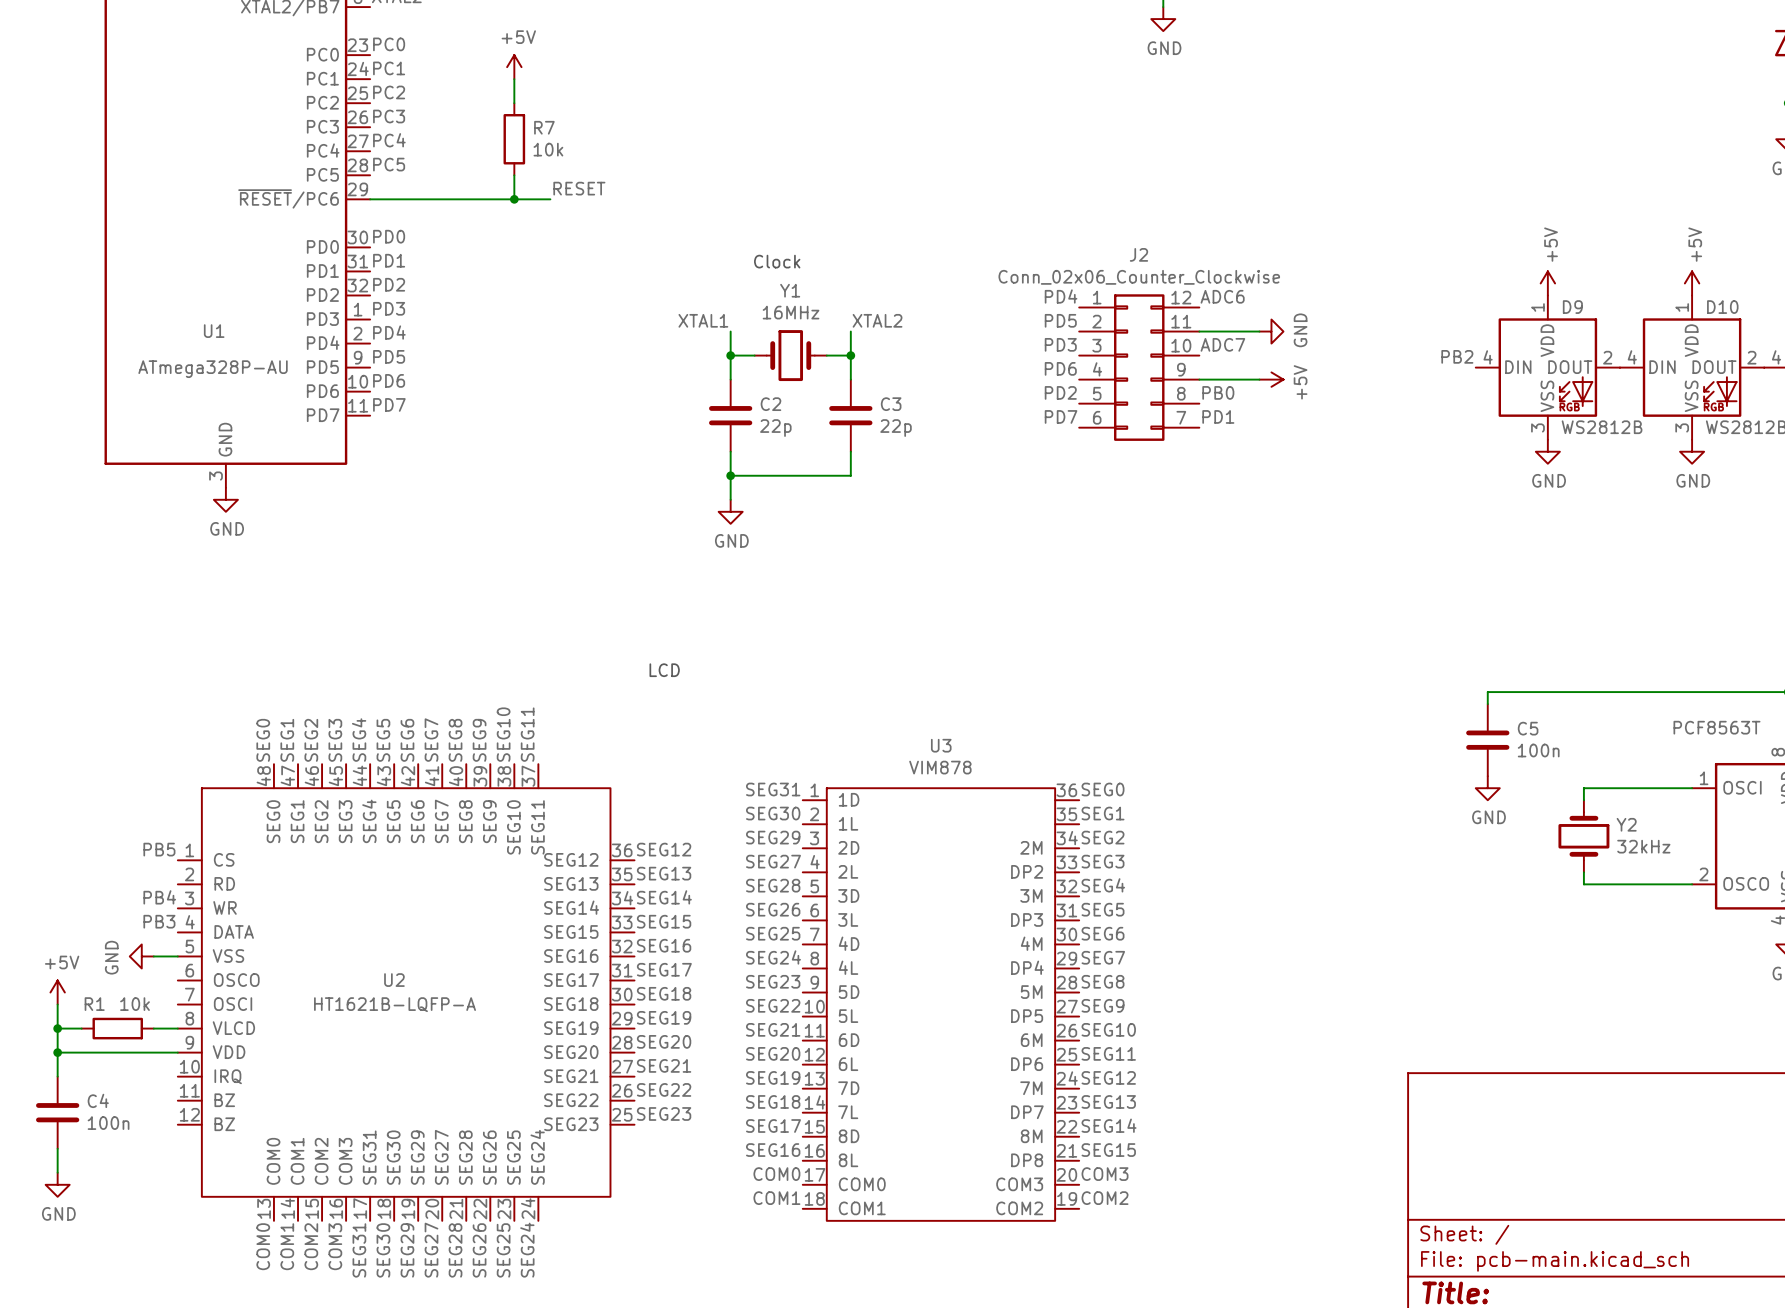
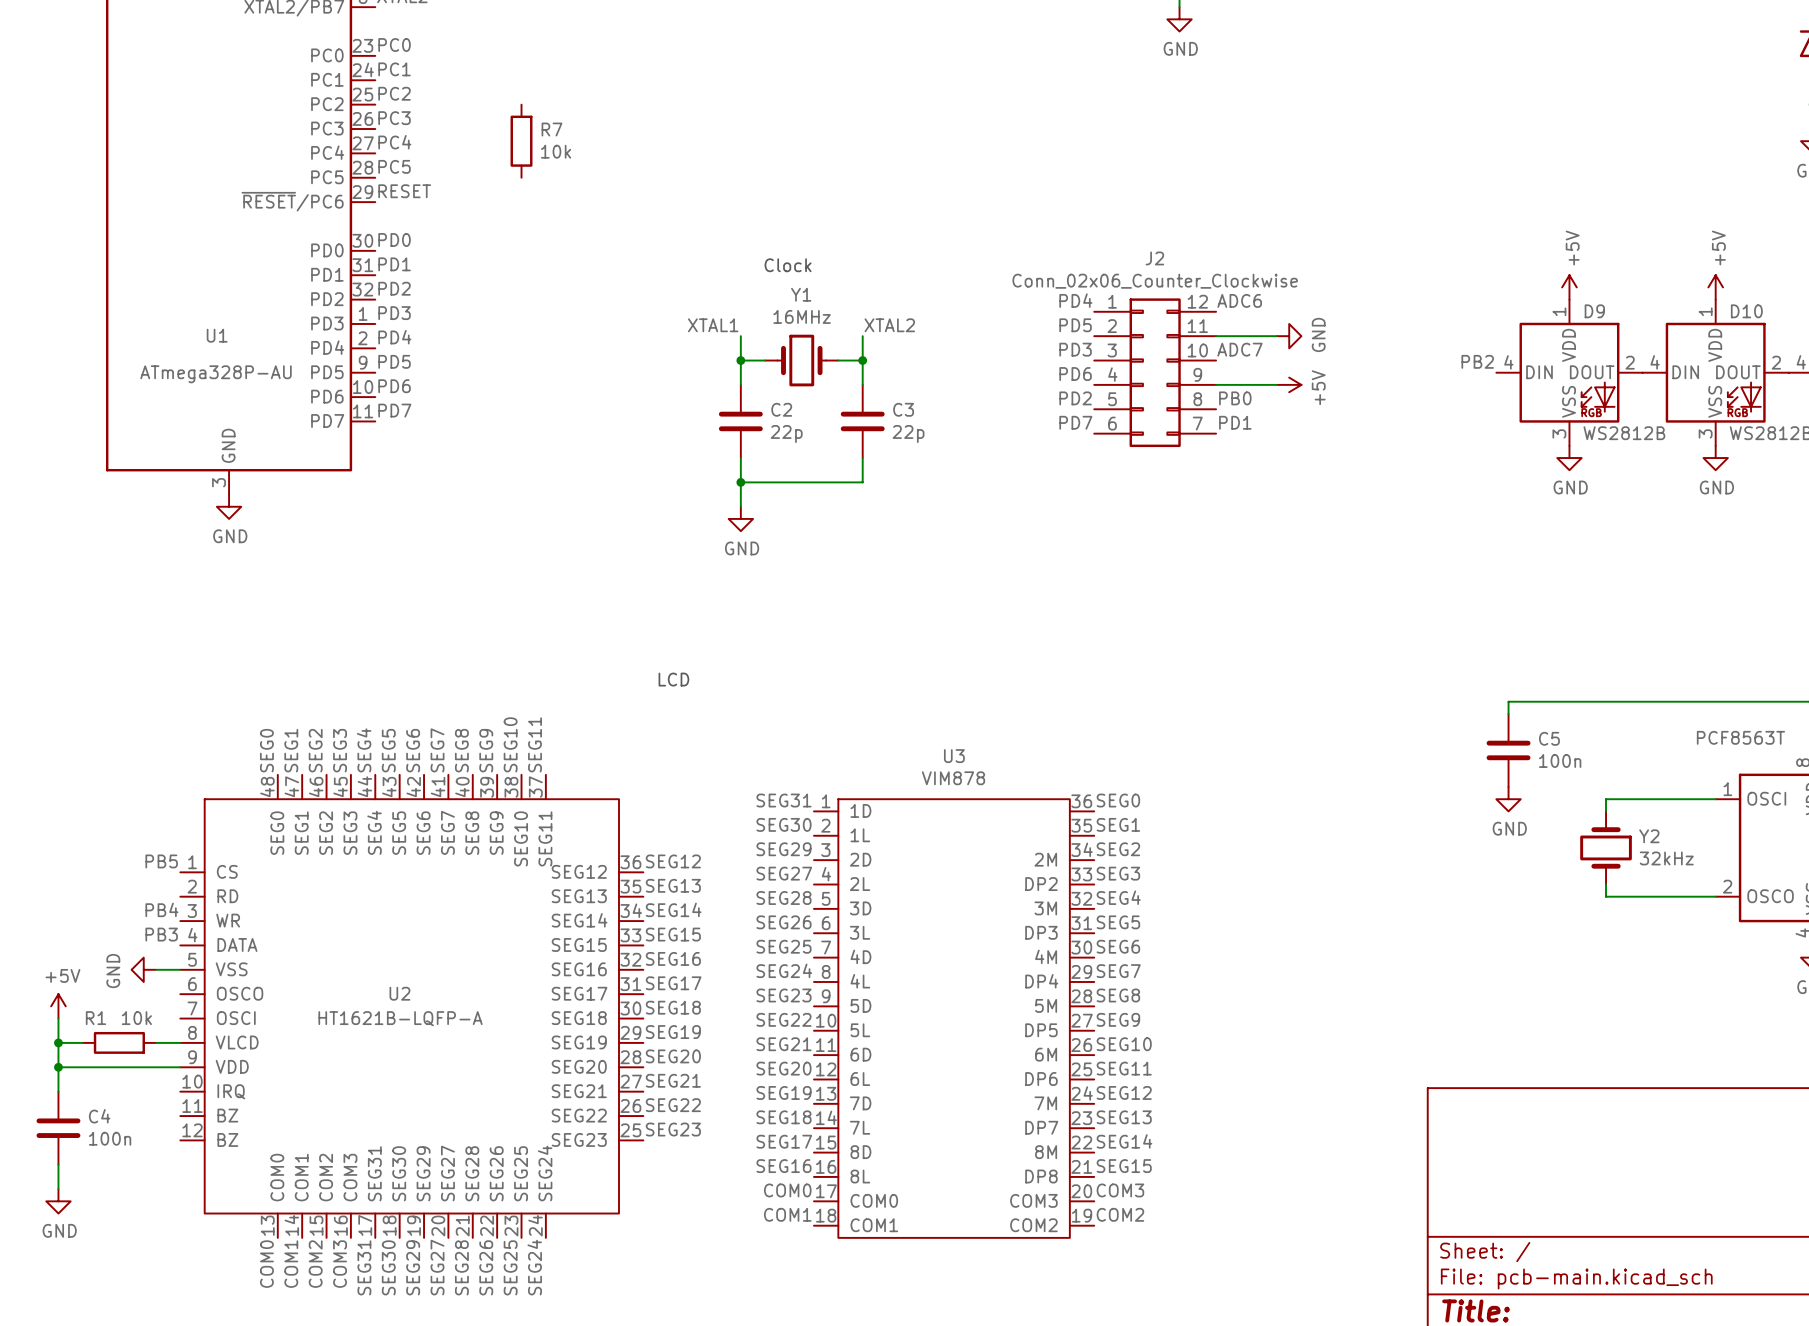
power symbol: +5V (514, 67) -> none
wire: (514, 79) (514, 103) -> none
wire: (514, 175) (514, 199) -> none
label position: RESET (579, 188) -> RESET (404, 191)
wire: (370, 199) (550, 199) -> none
junction: (514, 199) -> none

